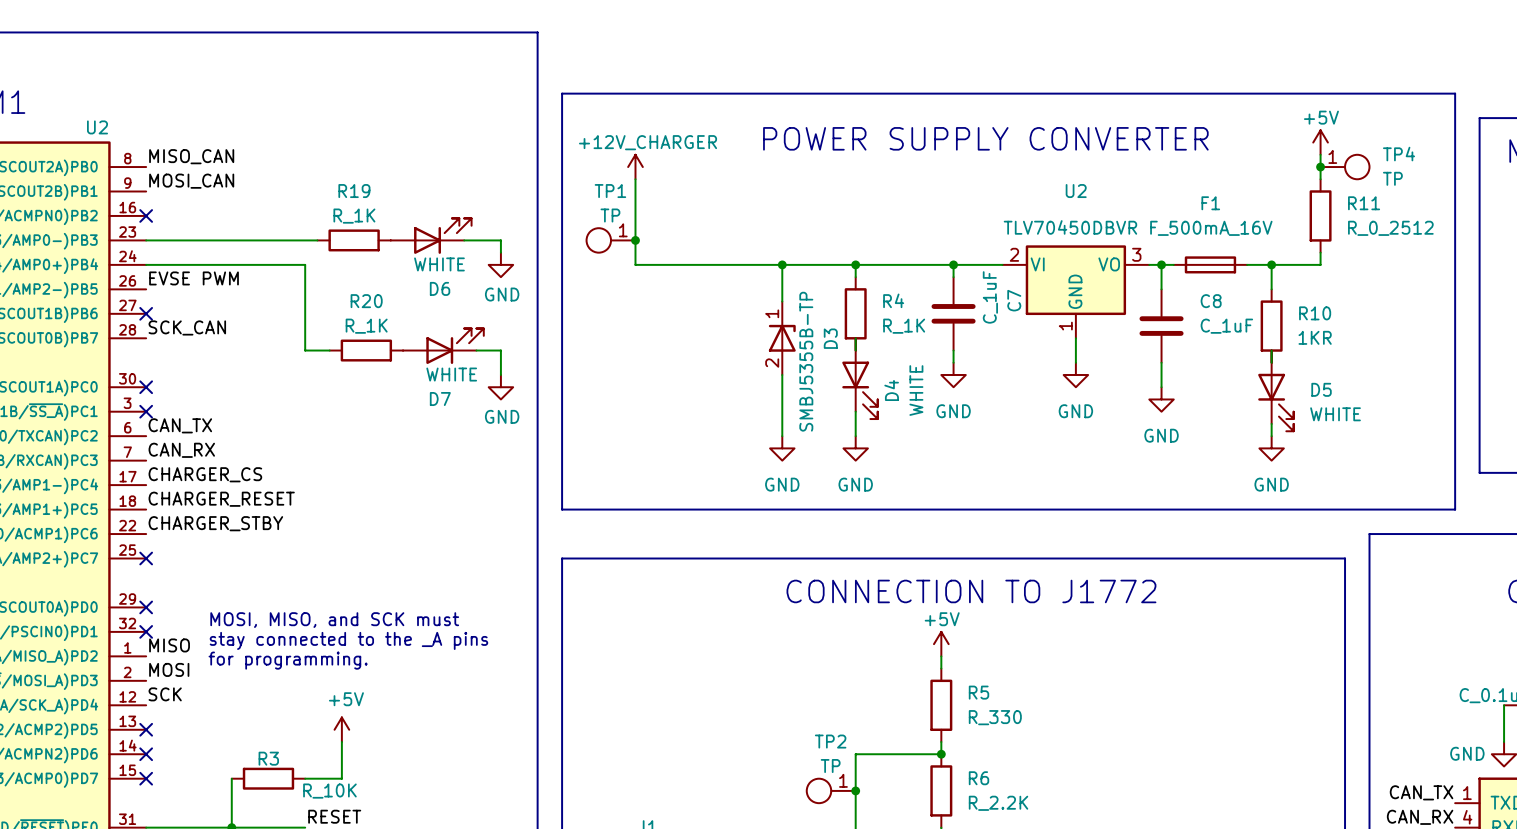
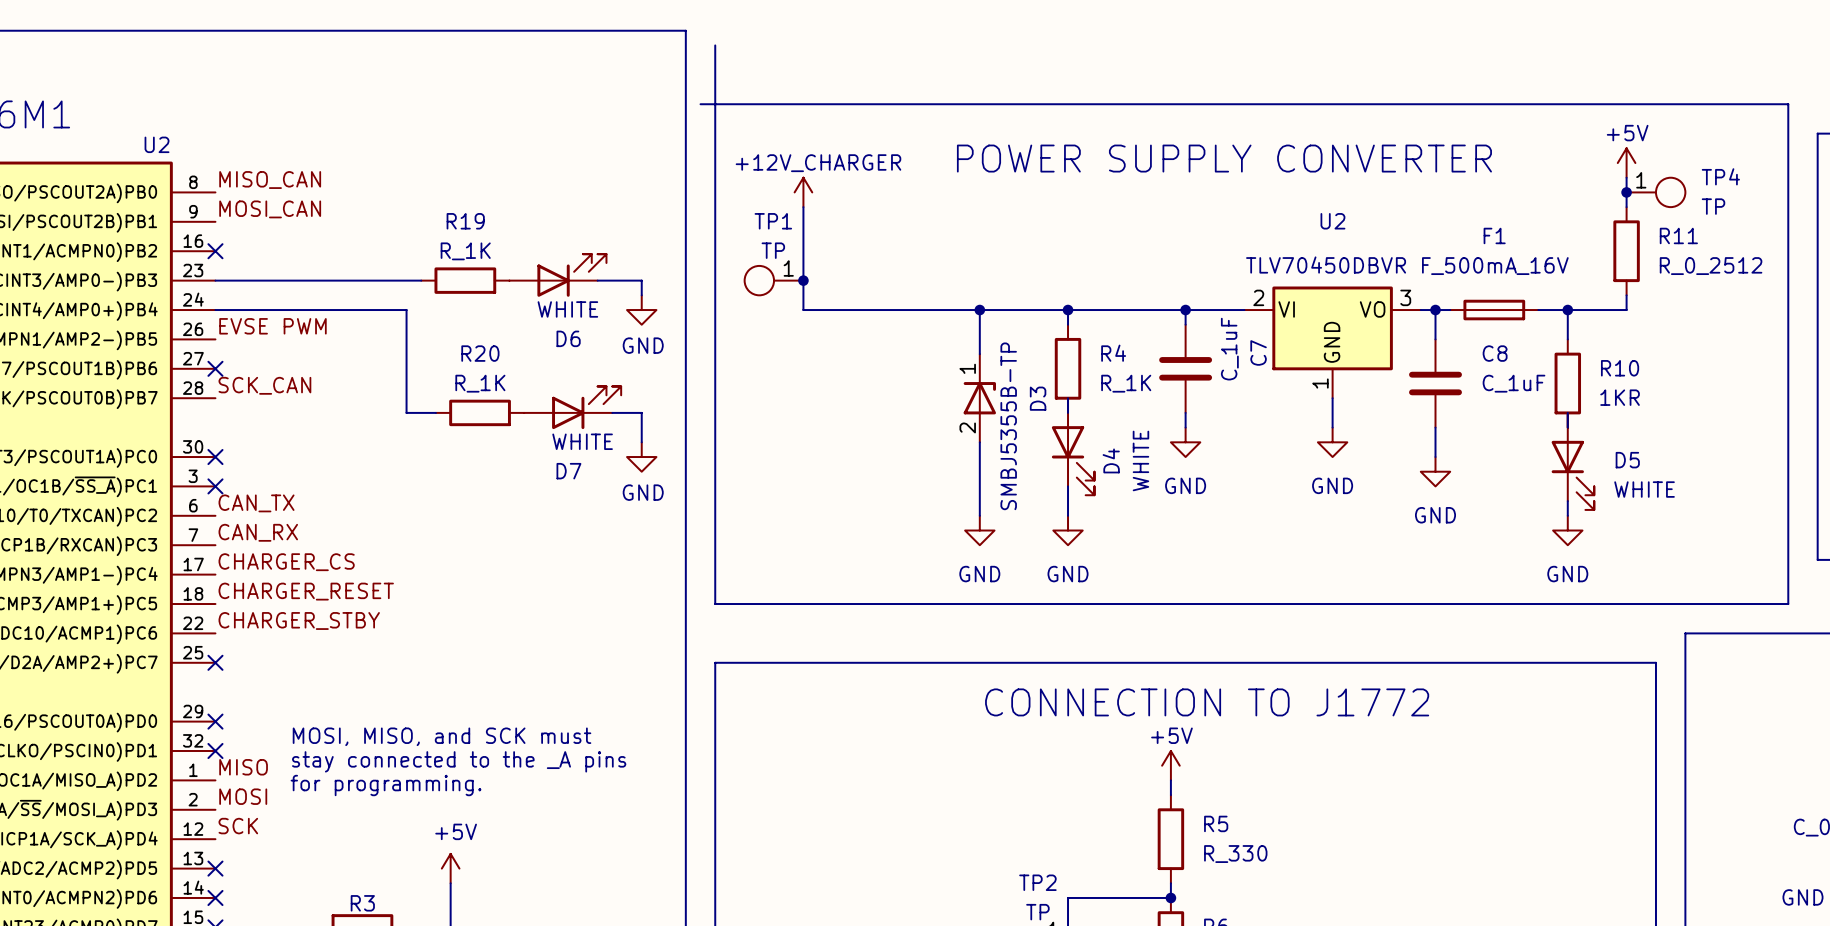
line: none -> (715, 45) (715, 104) (700, 104)

